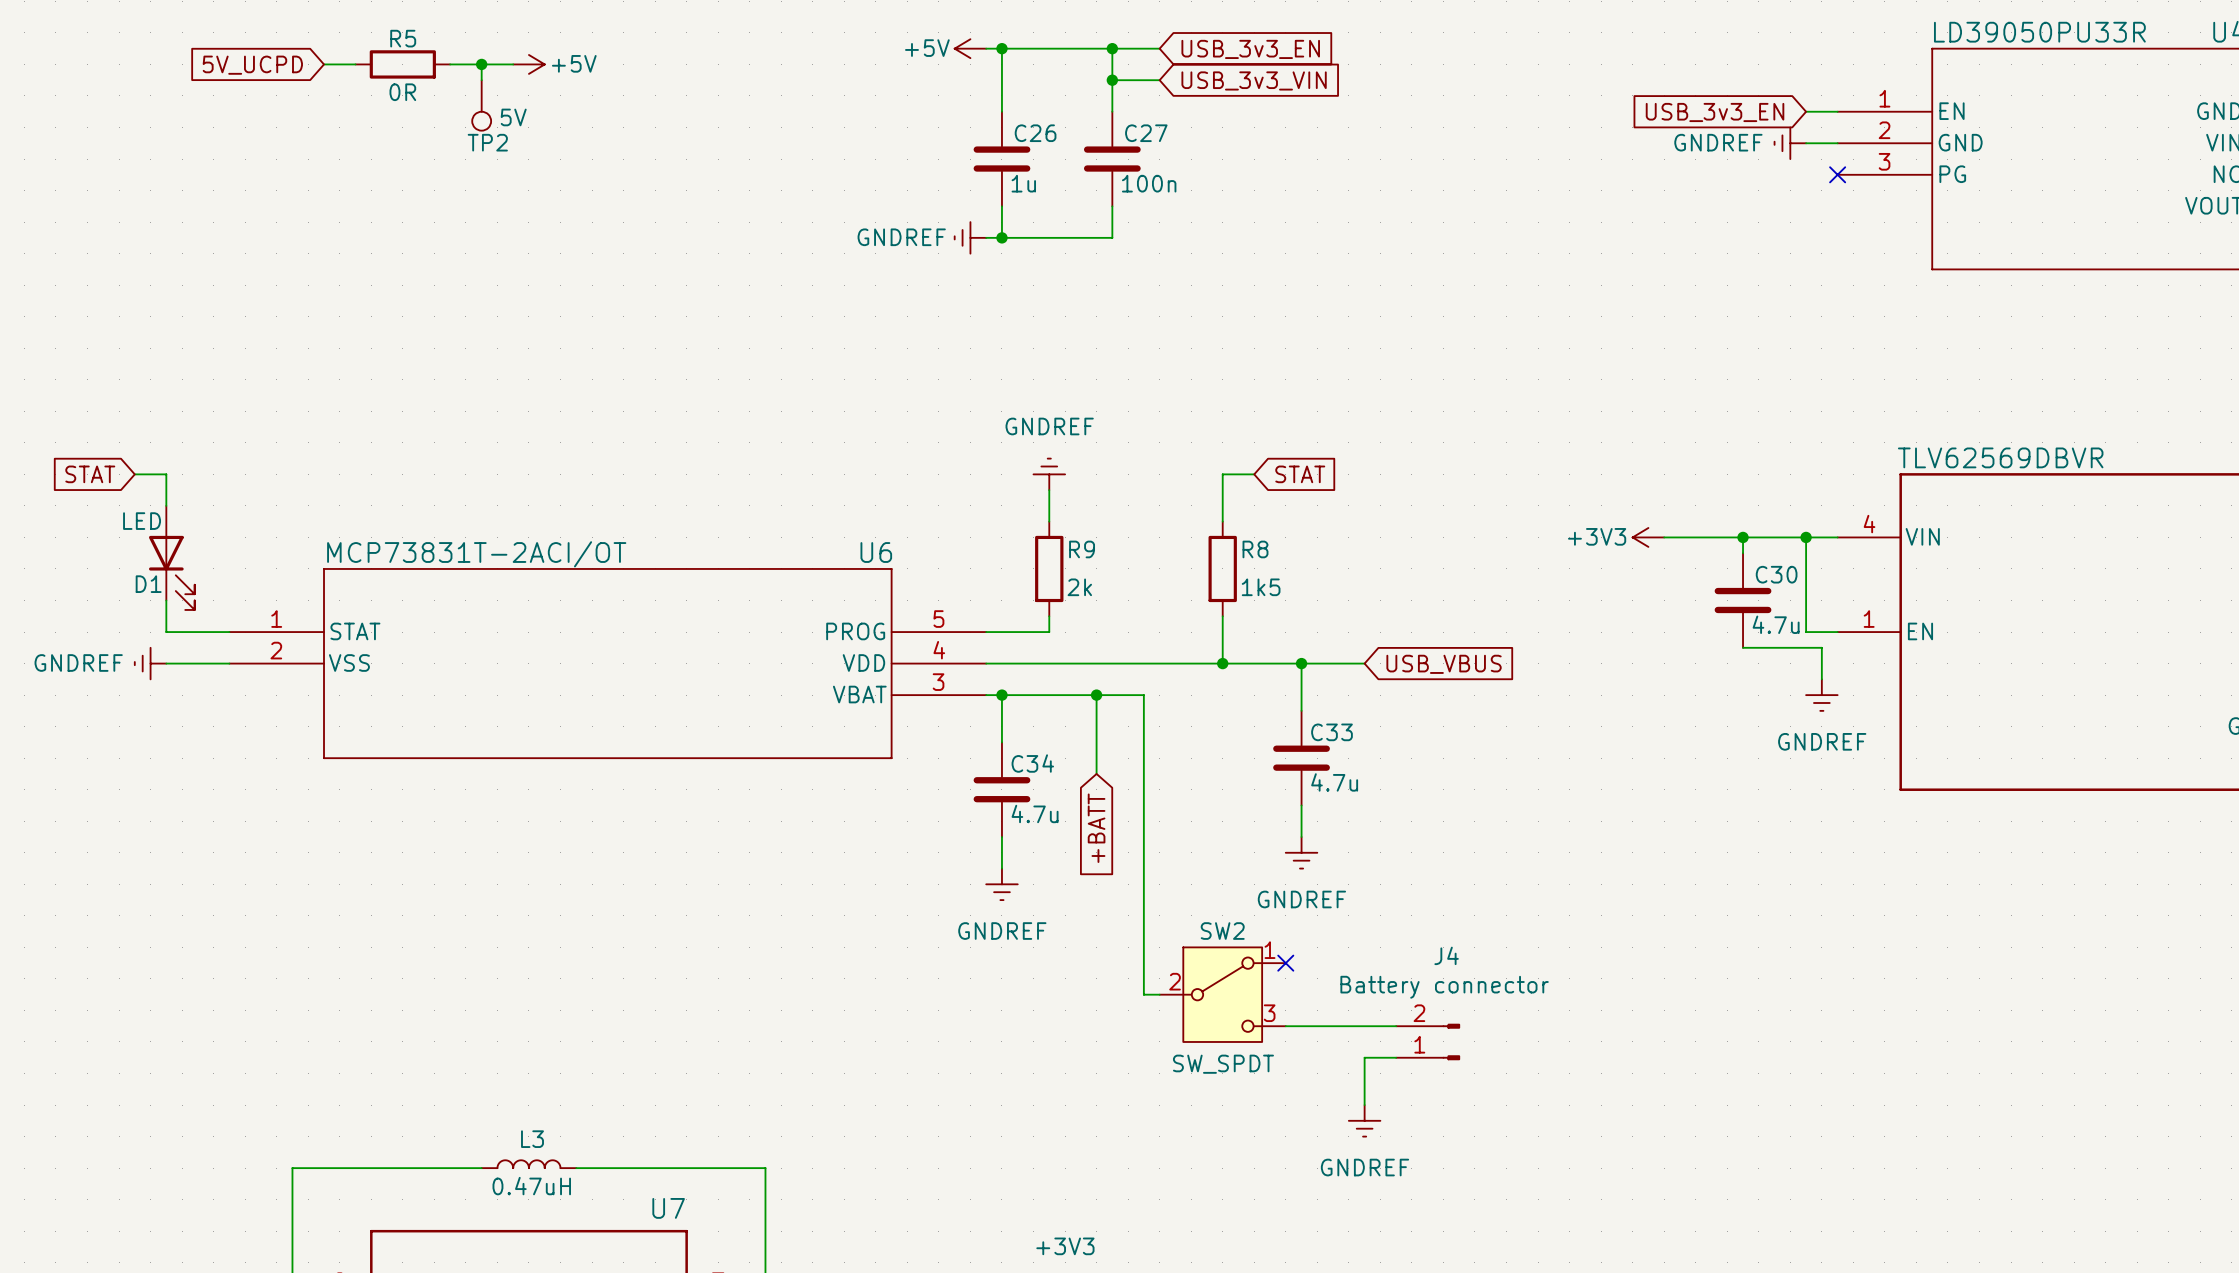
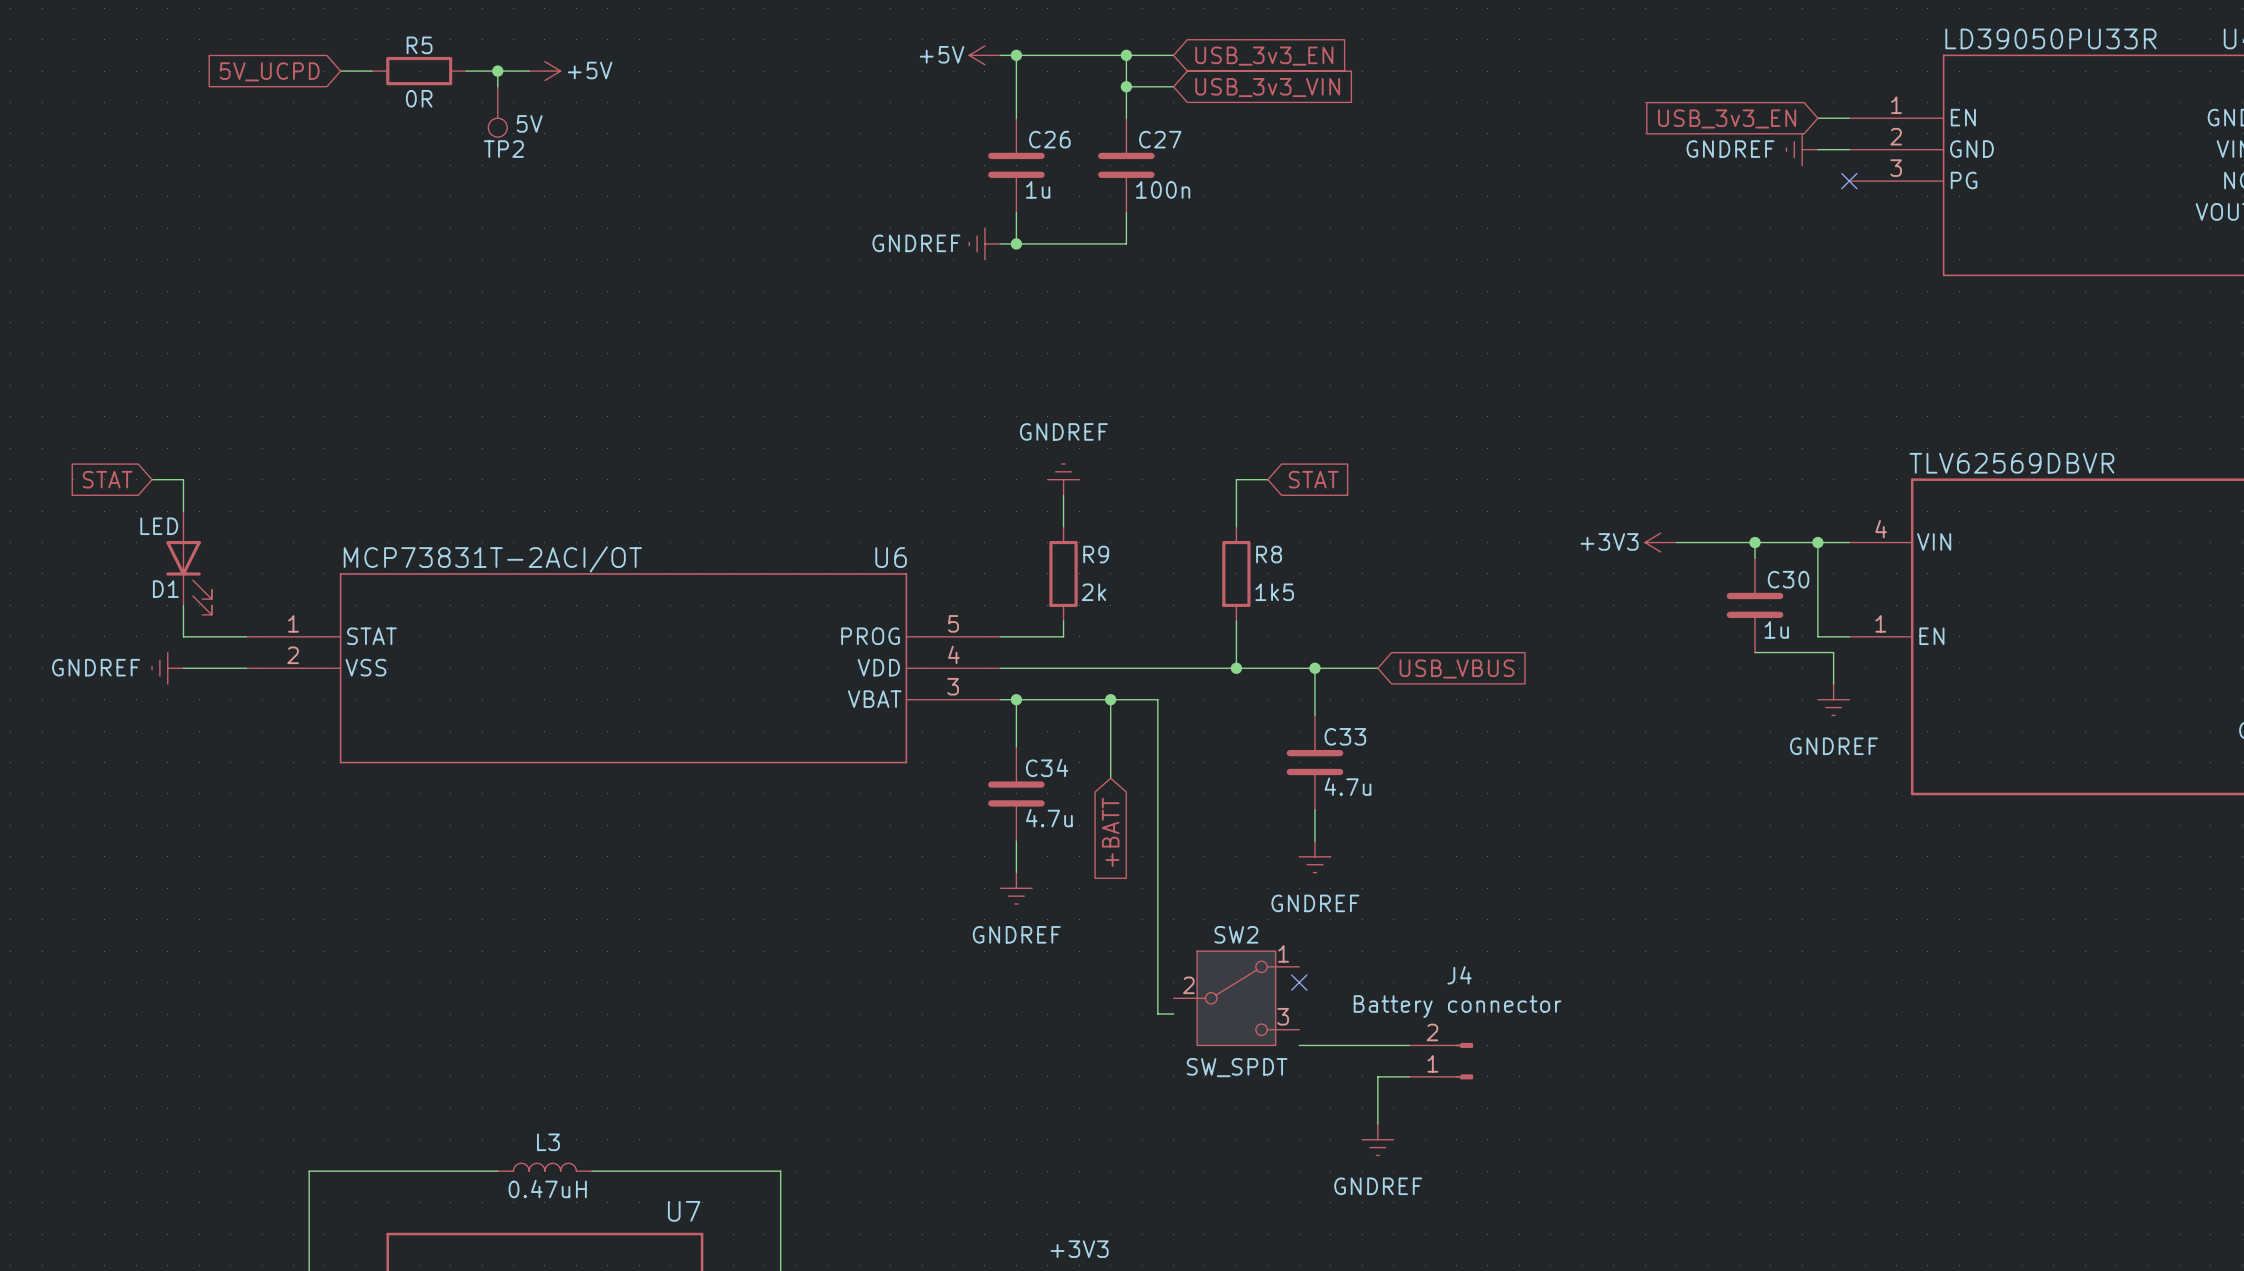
C30 value: 4.7u (1776, 624) -> 1u (1776, 629)
no-connect mark position: (1285, 963) -> (1299, 982)
wire: (1143, 994) (1159, 994) -> (1157, 998) (1157, 1014) (1173, 1014)
wire: (1285, 1026) (1396, 1026) -> (1299, 1045) (1409, 1045)
J4 position: (1428, 1041) -> (1441, 1061)
wire: (1396, 1057) (1364, 1057) (1364, 1073) -> (1409, 1076) (1377, 1076)
power symbol position: GNDREF (1364, 1120) -> GNDREF (1377, 1139)

